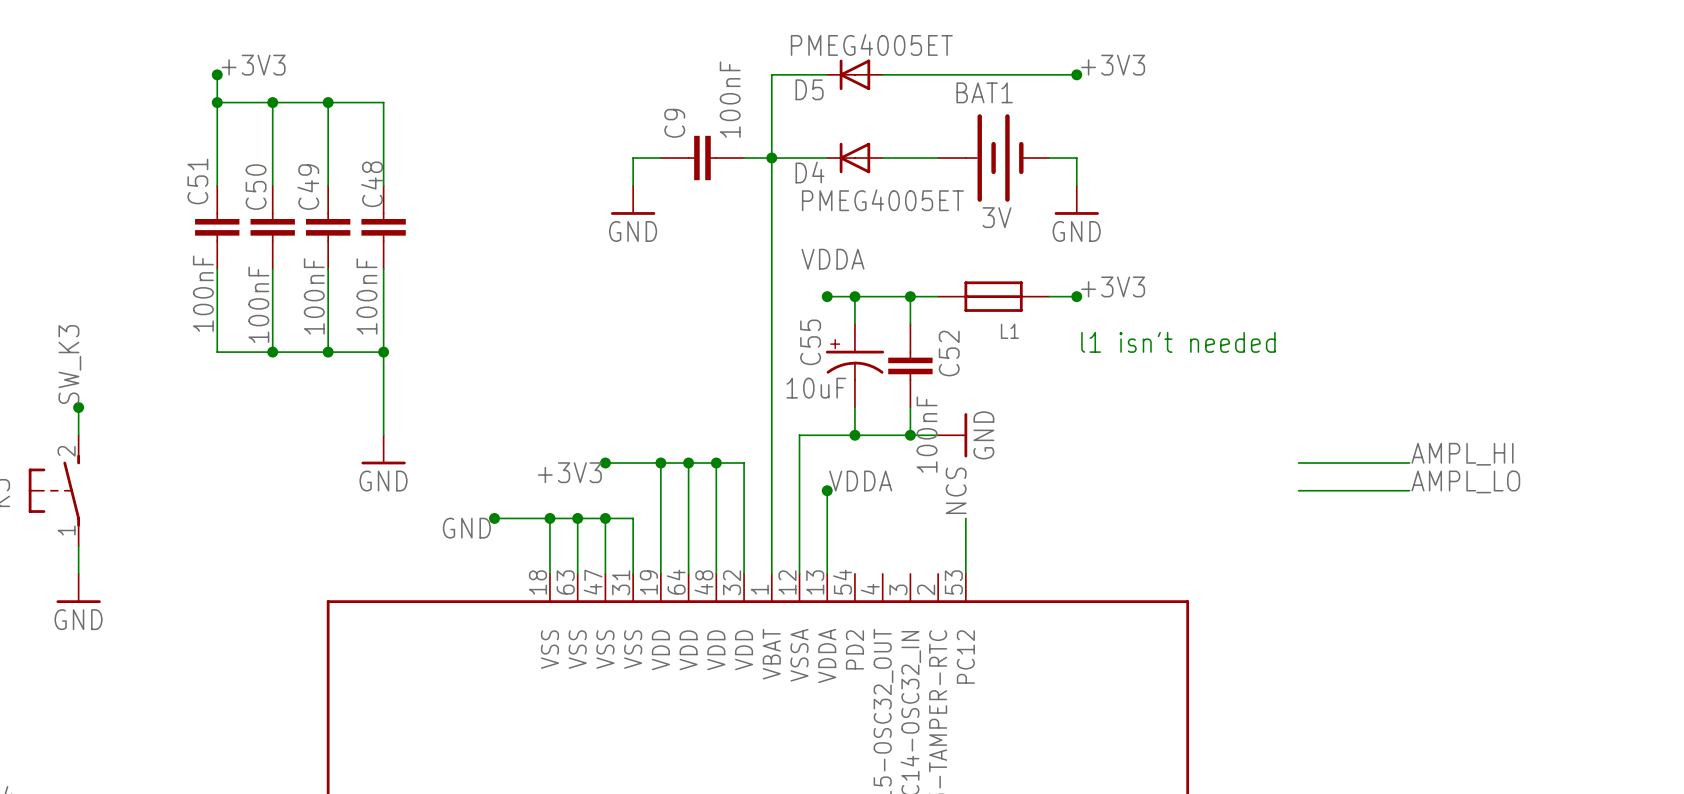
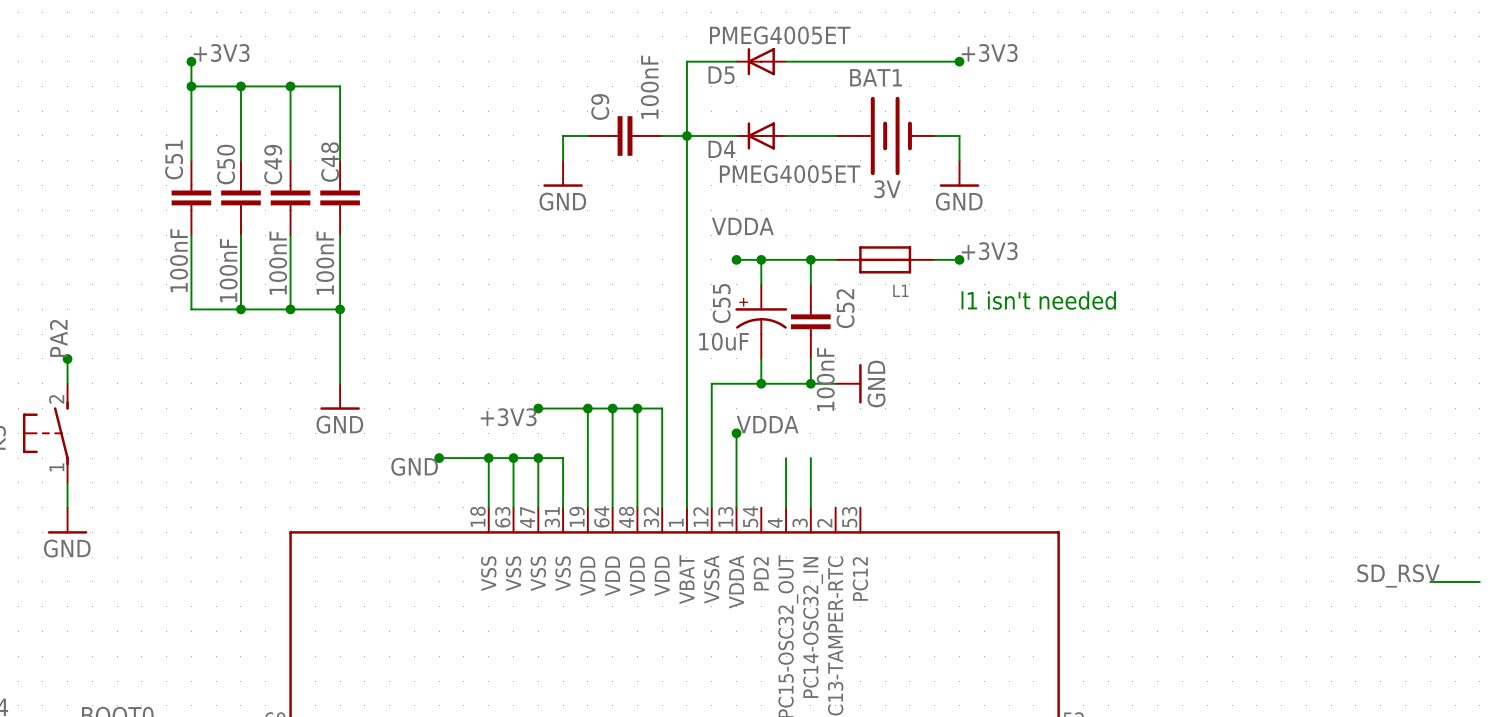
label: SW_K3 (69, 364) -> PA2 (58, 338)
label: AMPL_HI (1462, 454) -> none
wire: (1298, 463) (1409, 463) -> none
label: AMPL_LO (1465, 481) -> none
label: NCS (956, 490) -> none
wire: (1298, 490) (1409, 490) -> none
wire: none -> (786, 458) (786, 507)
wire: (965, 518) (965, 573) -> (810, 458) (810, 507)
label: none -> SD_RSV (1398, 575)
wire: none -> (1430, 581) (1479, 581)

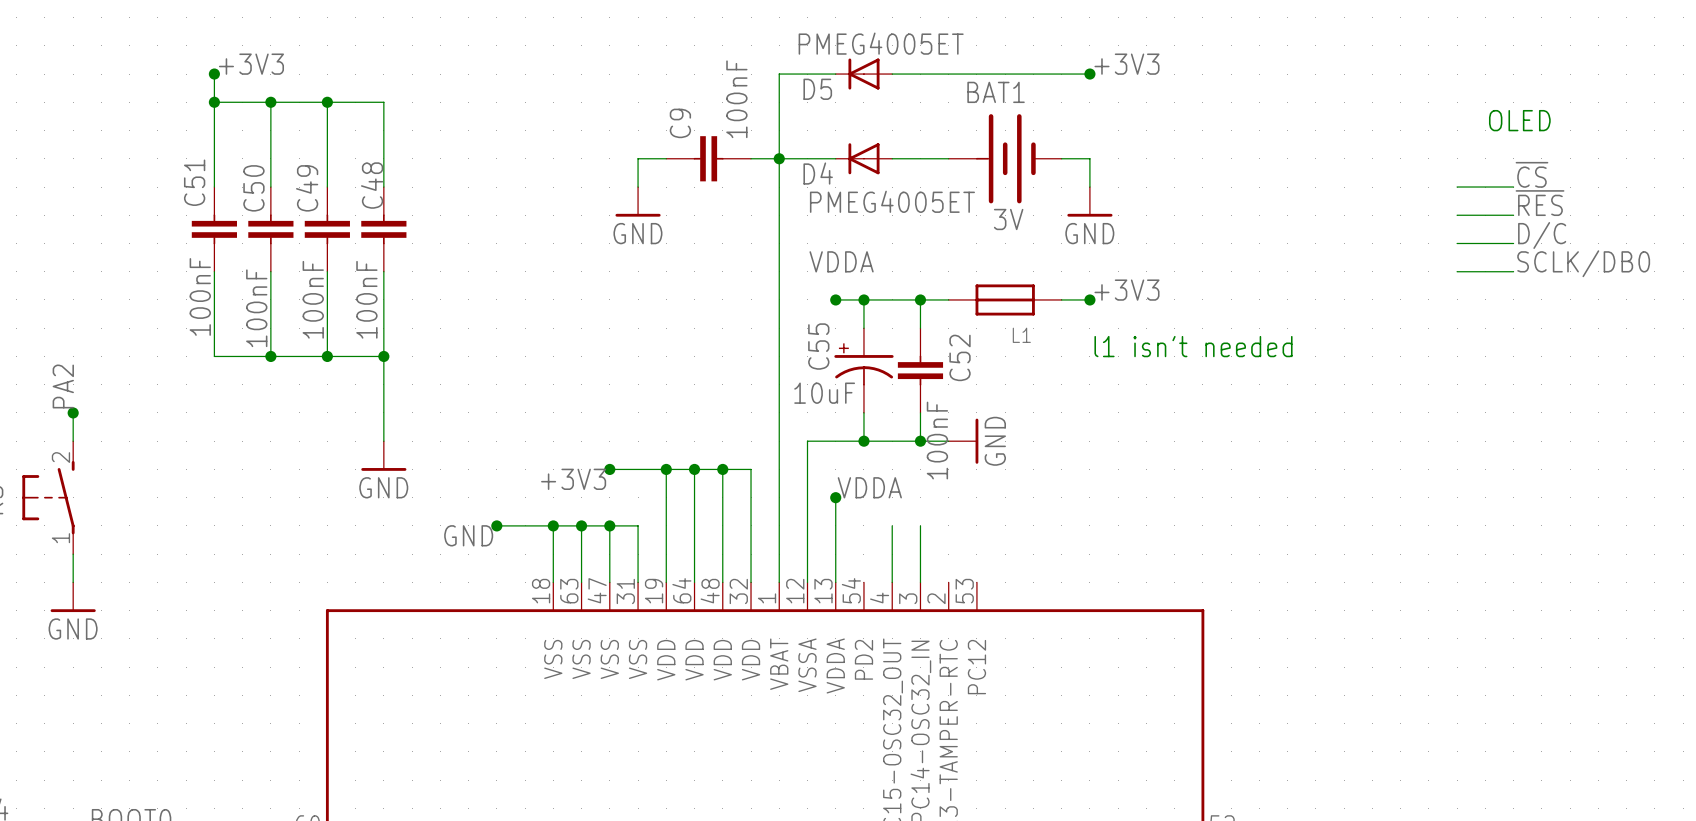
text: none -> OLED (1519, 120)
label: none -> ~{CS} (1531, 174)
wire: none -> (1457, 187) (1513, 187)
label: none -> ~{RES} (1540, 203)
wire: none -> (1457, 215) (1513, 215)
label: none -> D/C (1542, 235)
wire: none -> (1457, 243) (1513, 243)
label: none -> SCLK/DB0 (1583, 263)
wire: none -> (1457, 271) (1513, 271)
label: SD_RSV (1398, 575) -> none
wire: (1430, 581) (1479, 581) -> none

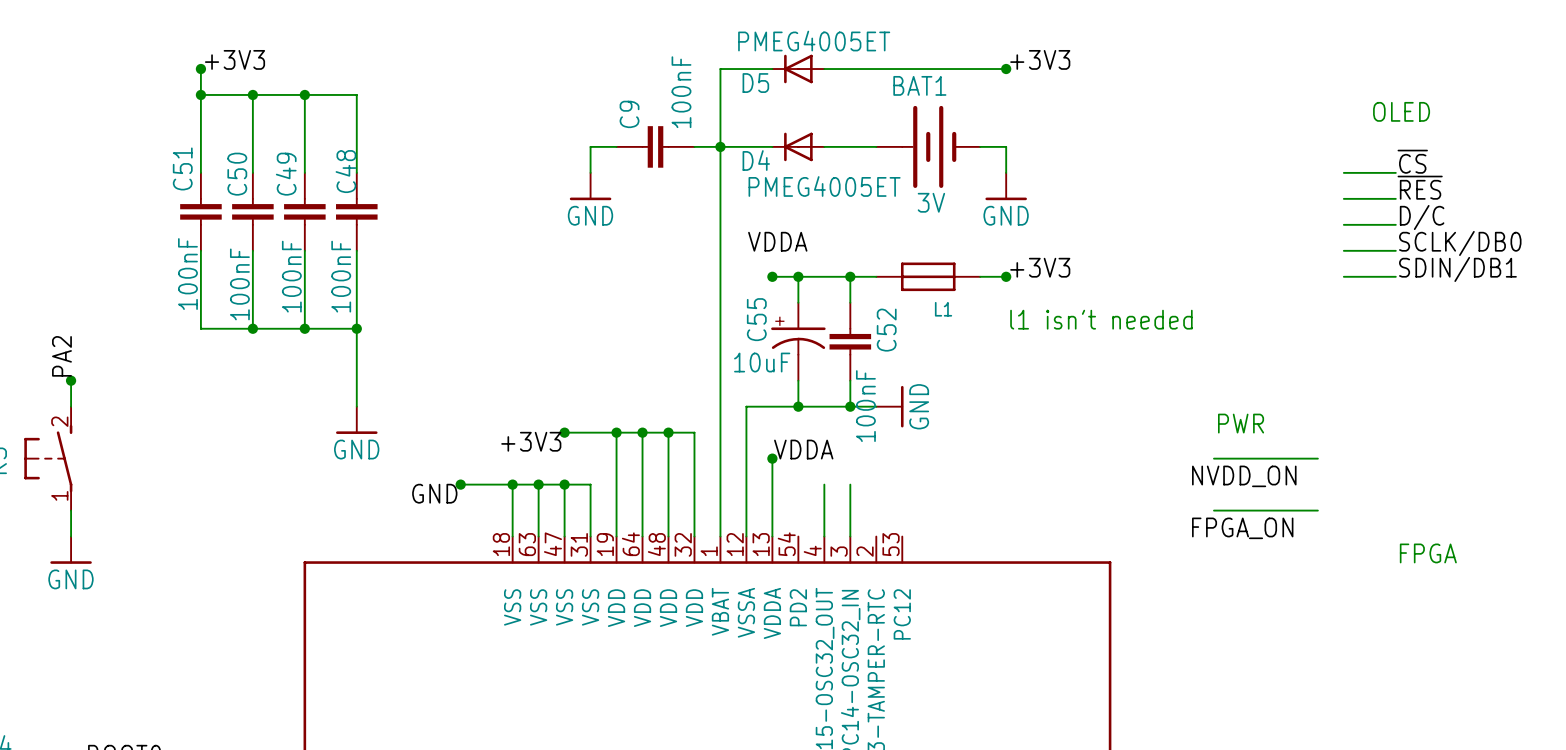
label: none -> SDIN/DB1 (1457, 269)
wire: none -> (1343, 276) (1395, 276)
text: none -> PWR (1241, 423)
wire: none -> (1213, 458) (1317, 458)
label: none -> NVDD_ON (1244, 476)
wire: none -> (1213, 510) (1317, 510)
label: none -> FPGA_ON (1242, 528)
text: none -> FPGA (1428, 553)

